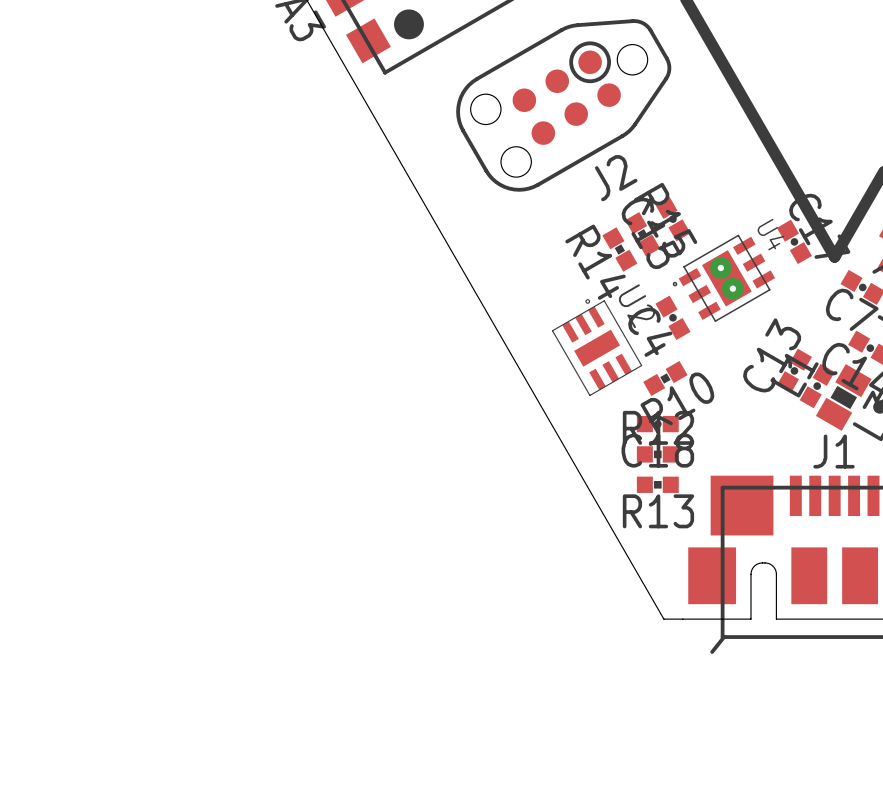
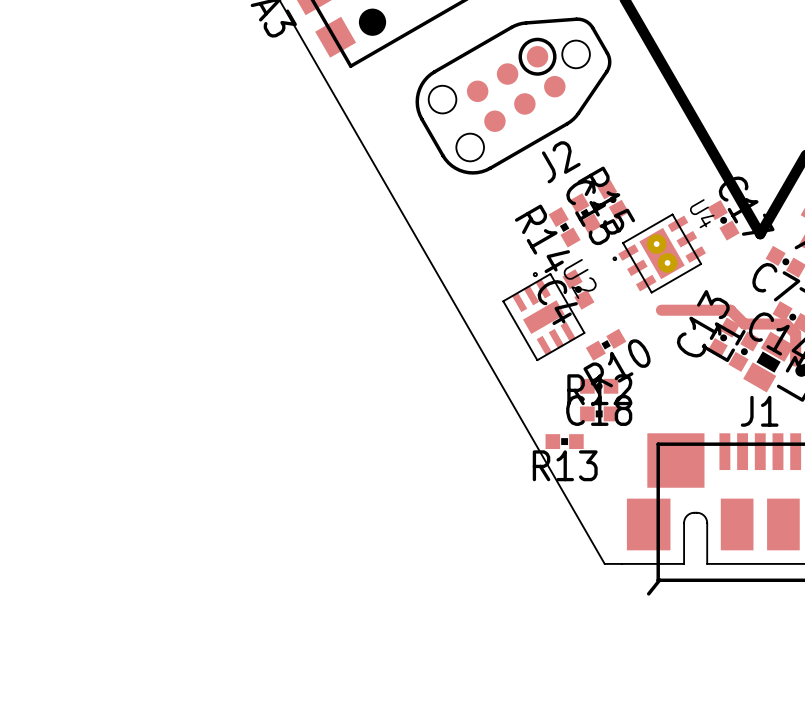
C4 position: (673, 317) -> (578, 289)
track: none -> (661, 310) (730, 310) (744, 324) (785, 324) (795, 333) (795, 361)
R13 position: (657, 484) -> (564, 441)

